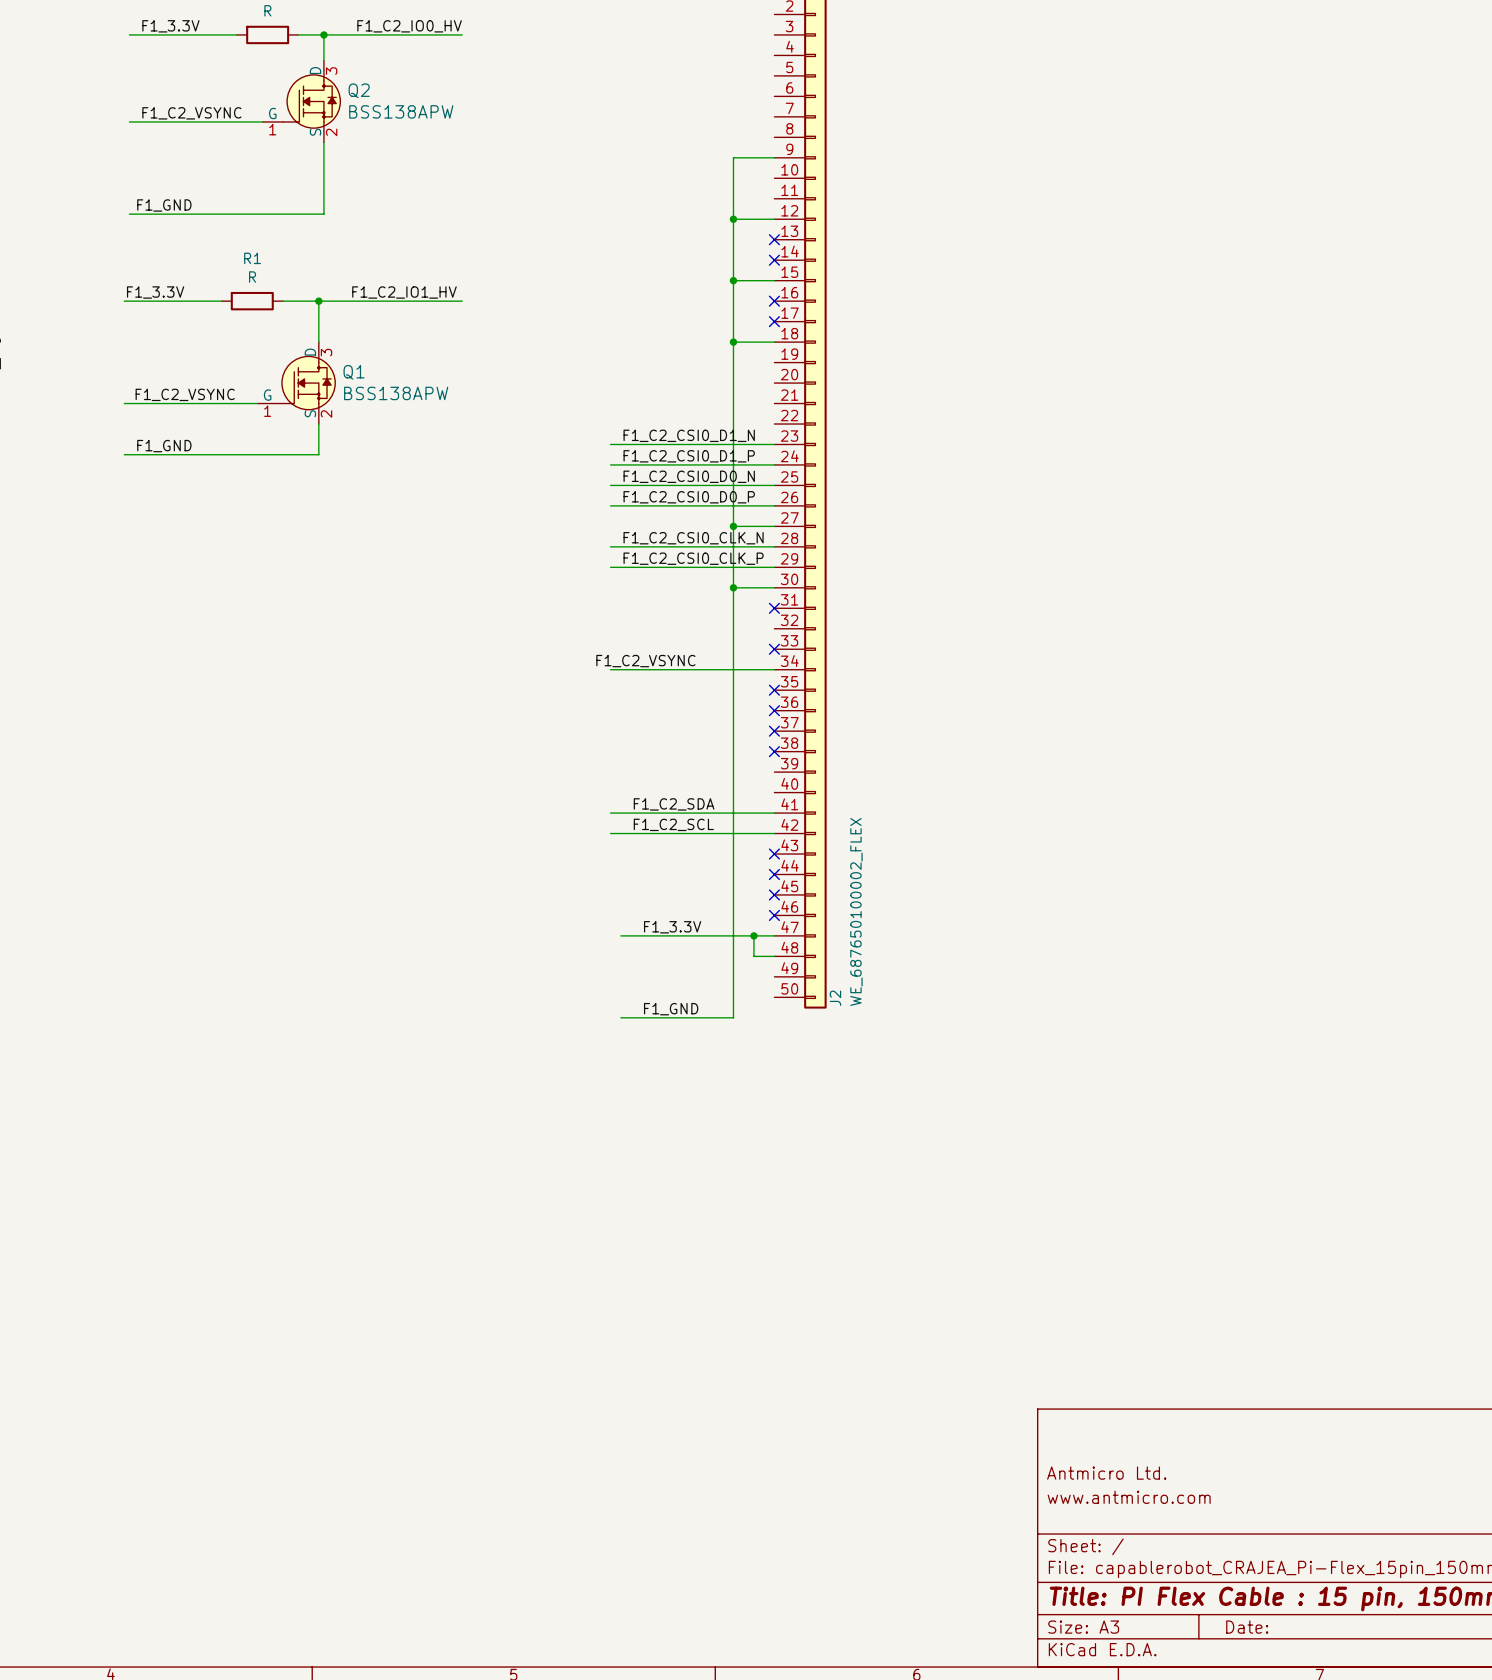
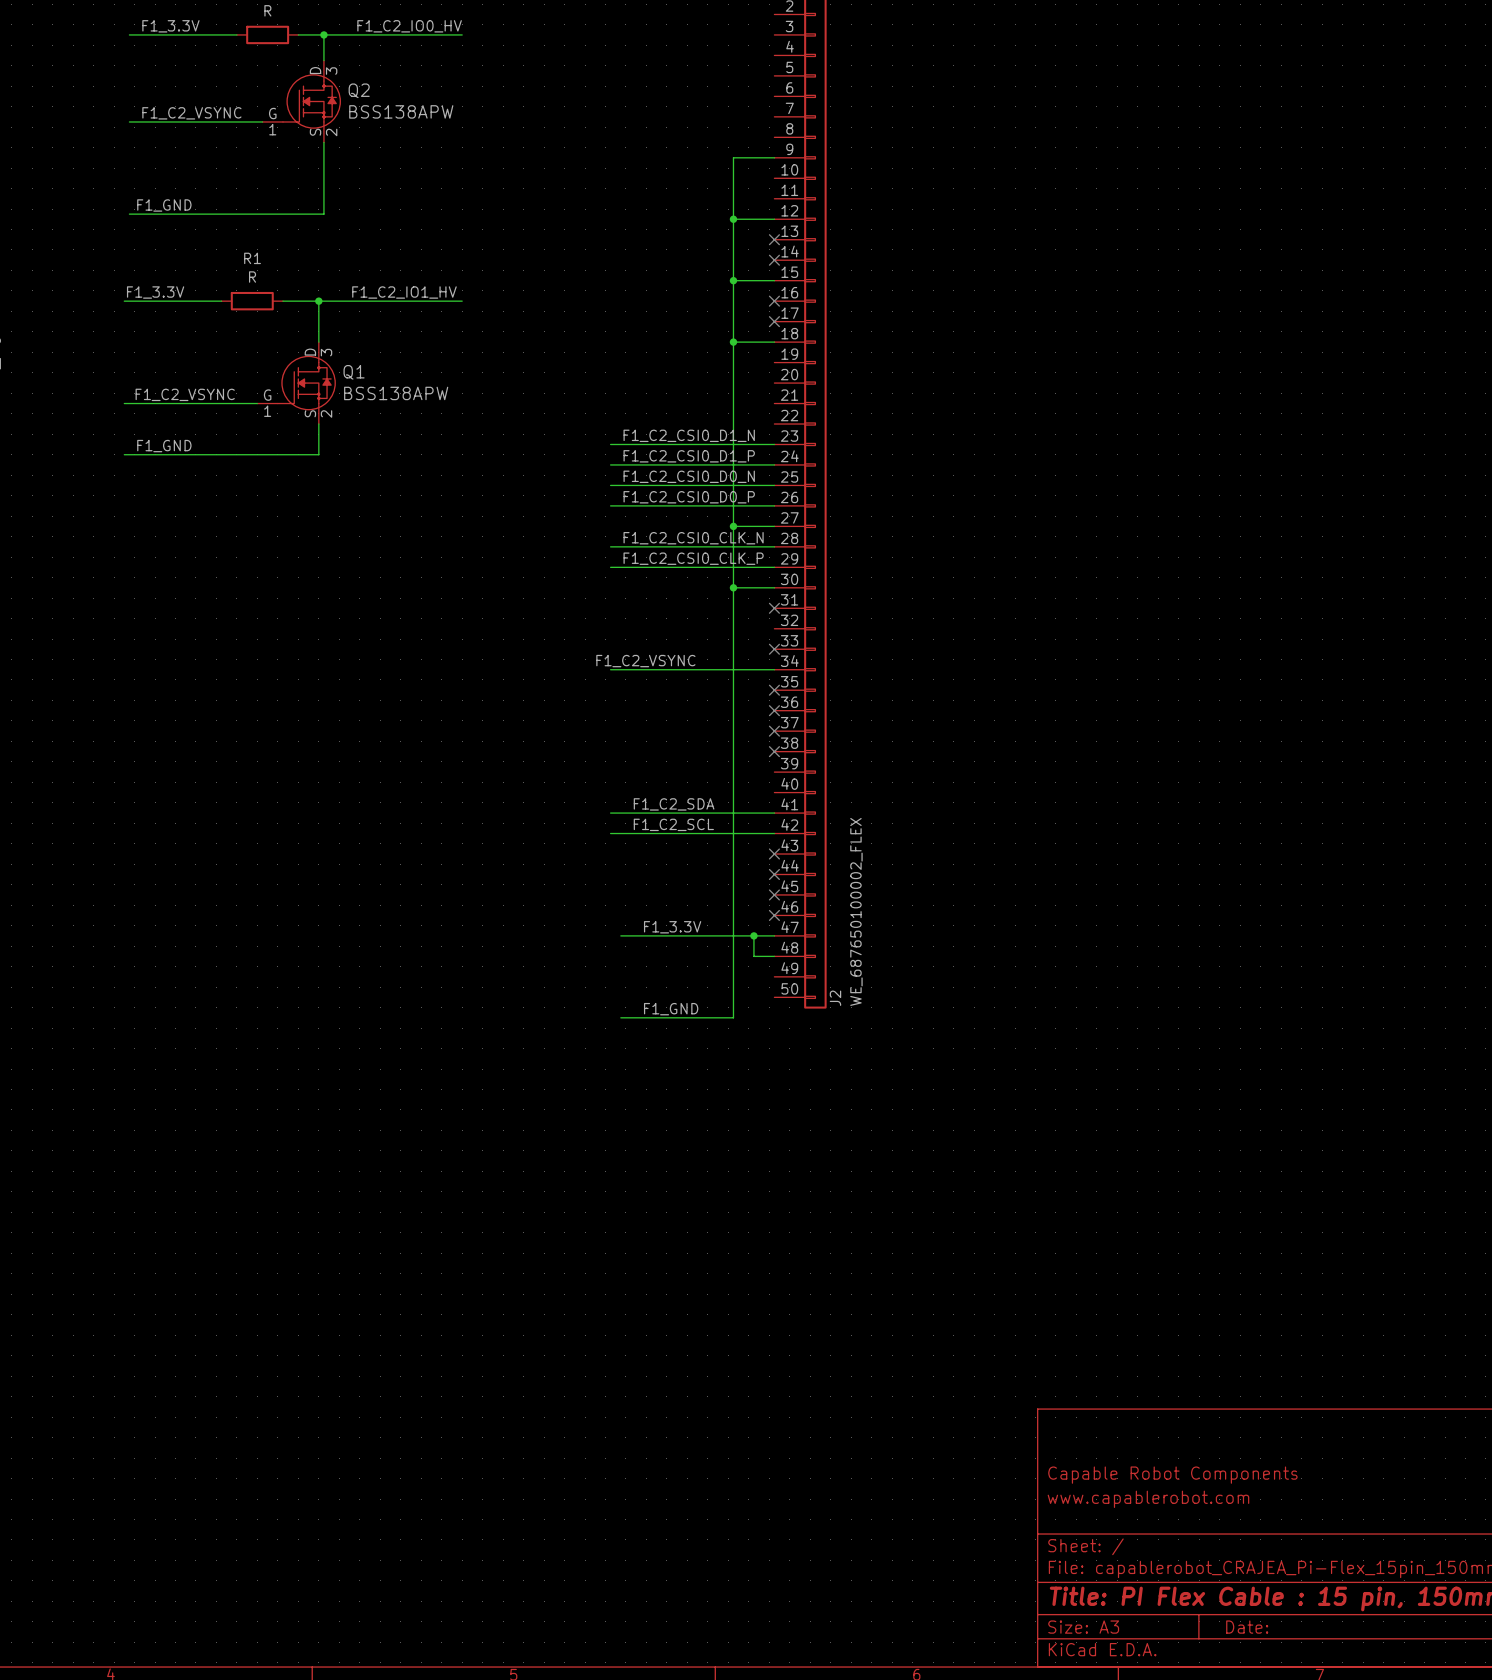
title block: Antmicro Ltd. (1106, 1473) -> Capable Robot Components (1172, 1475)
title block: www.antmicro.com (1129, 1497) -> www.capablerobot.com (1148, 1499)

